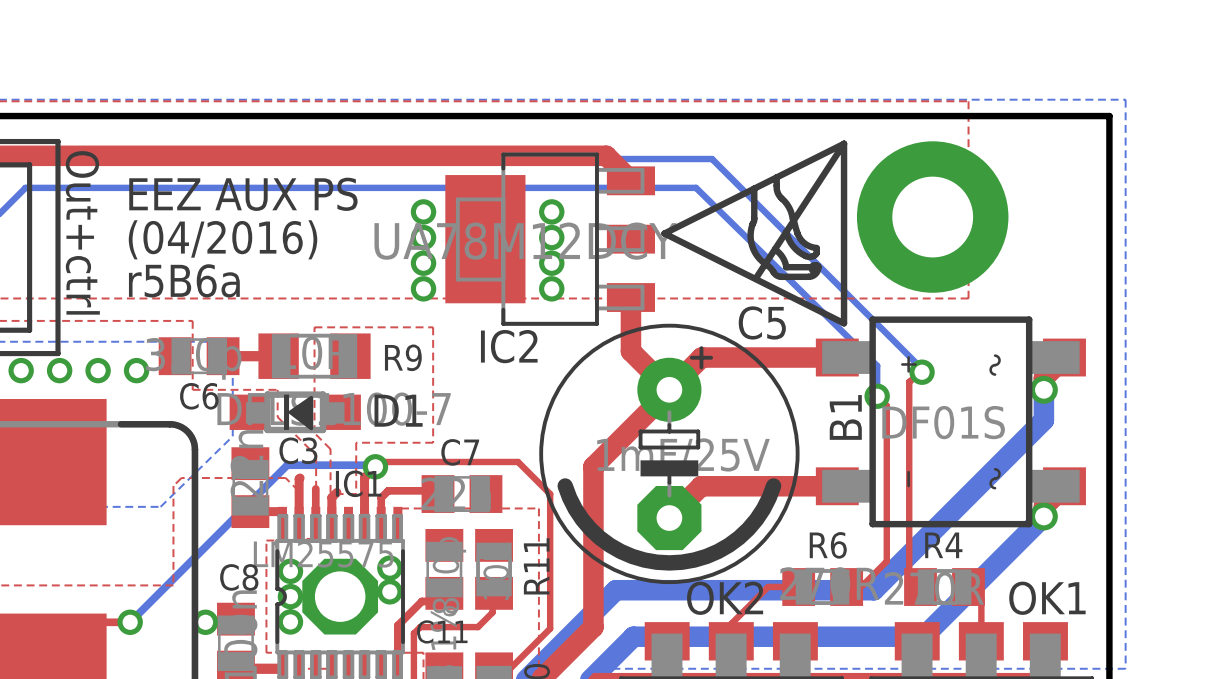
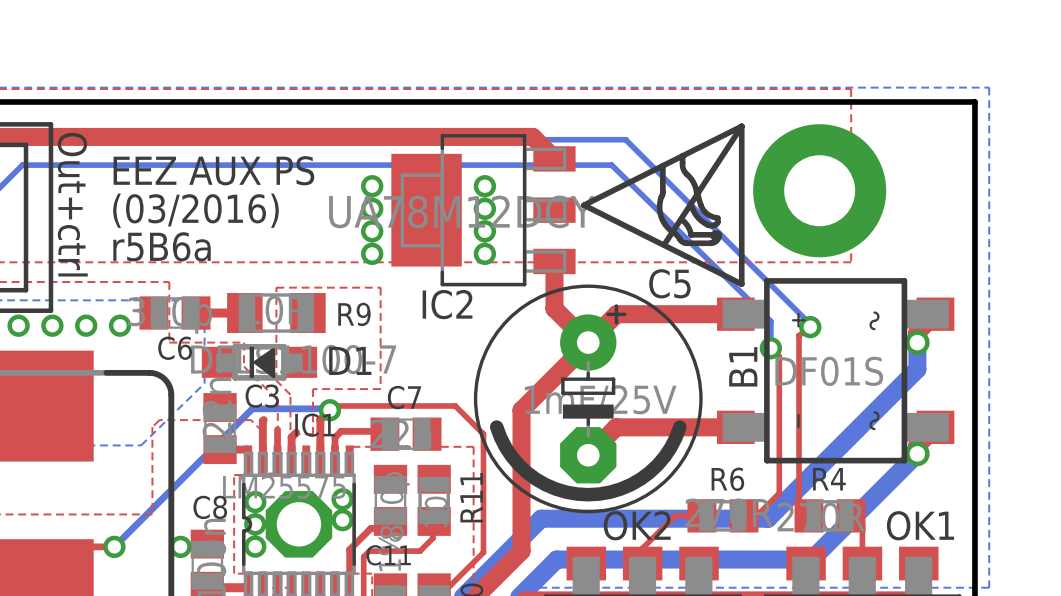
text: (04/2016) (223, 239) -> (03/2016) (195, 210)

